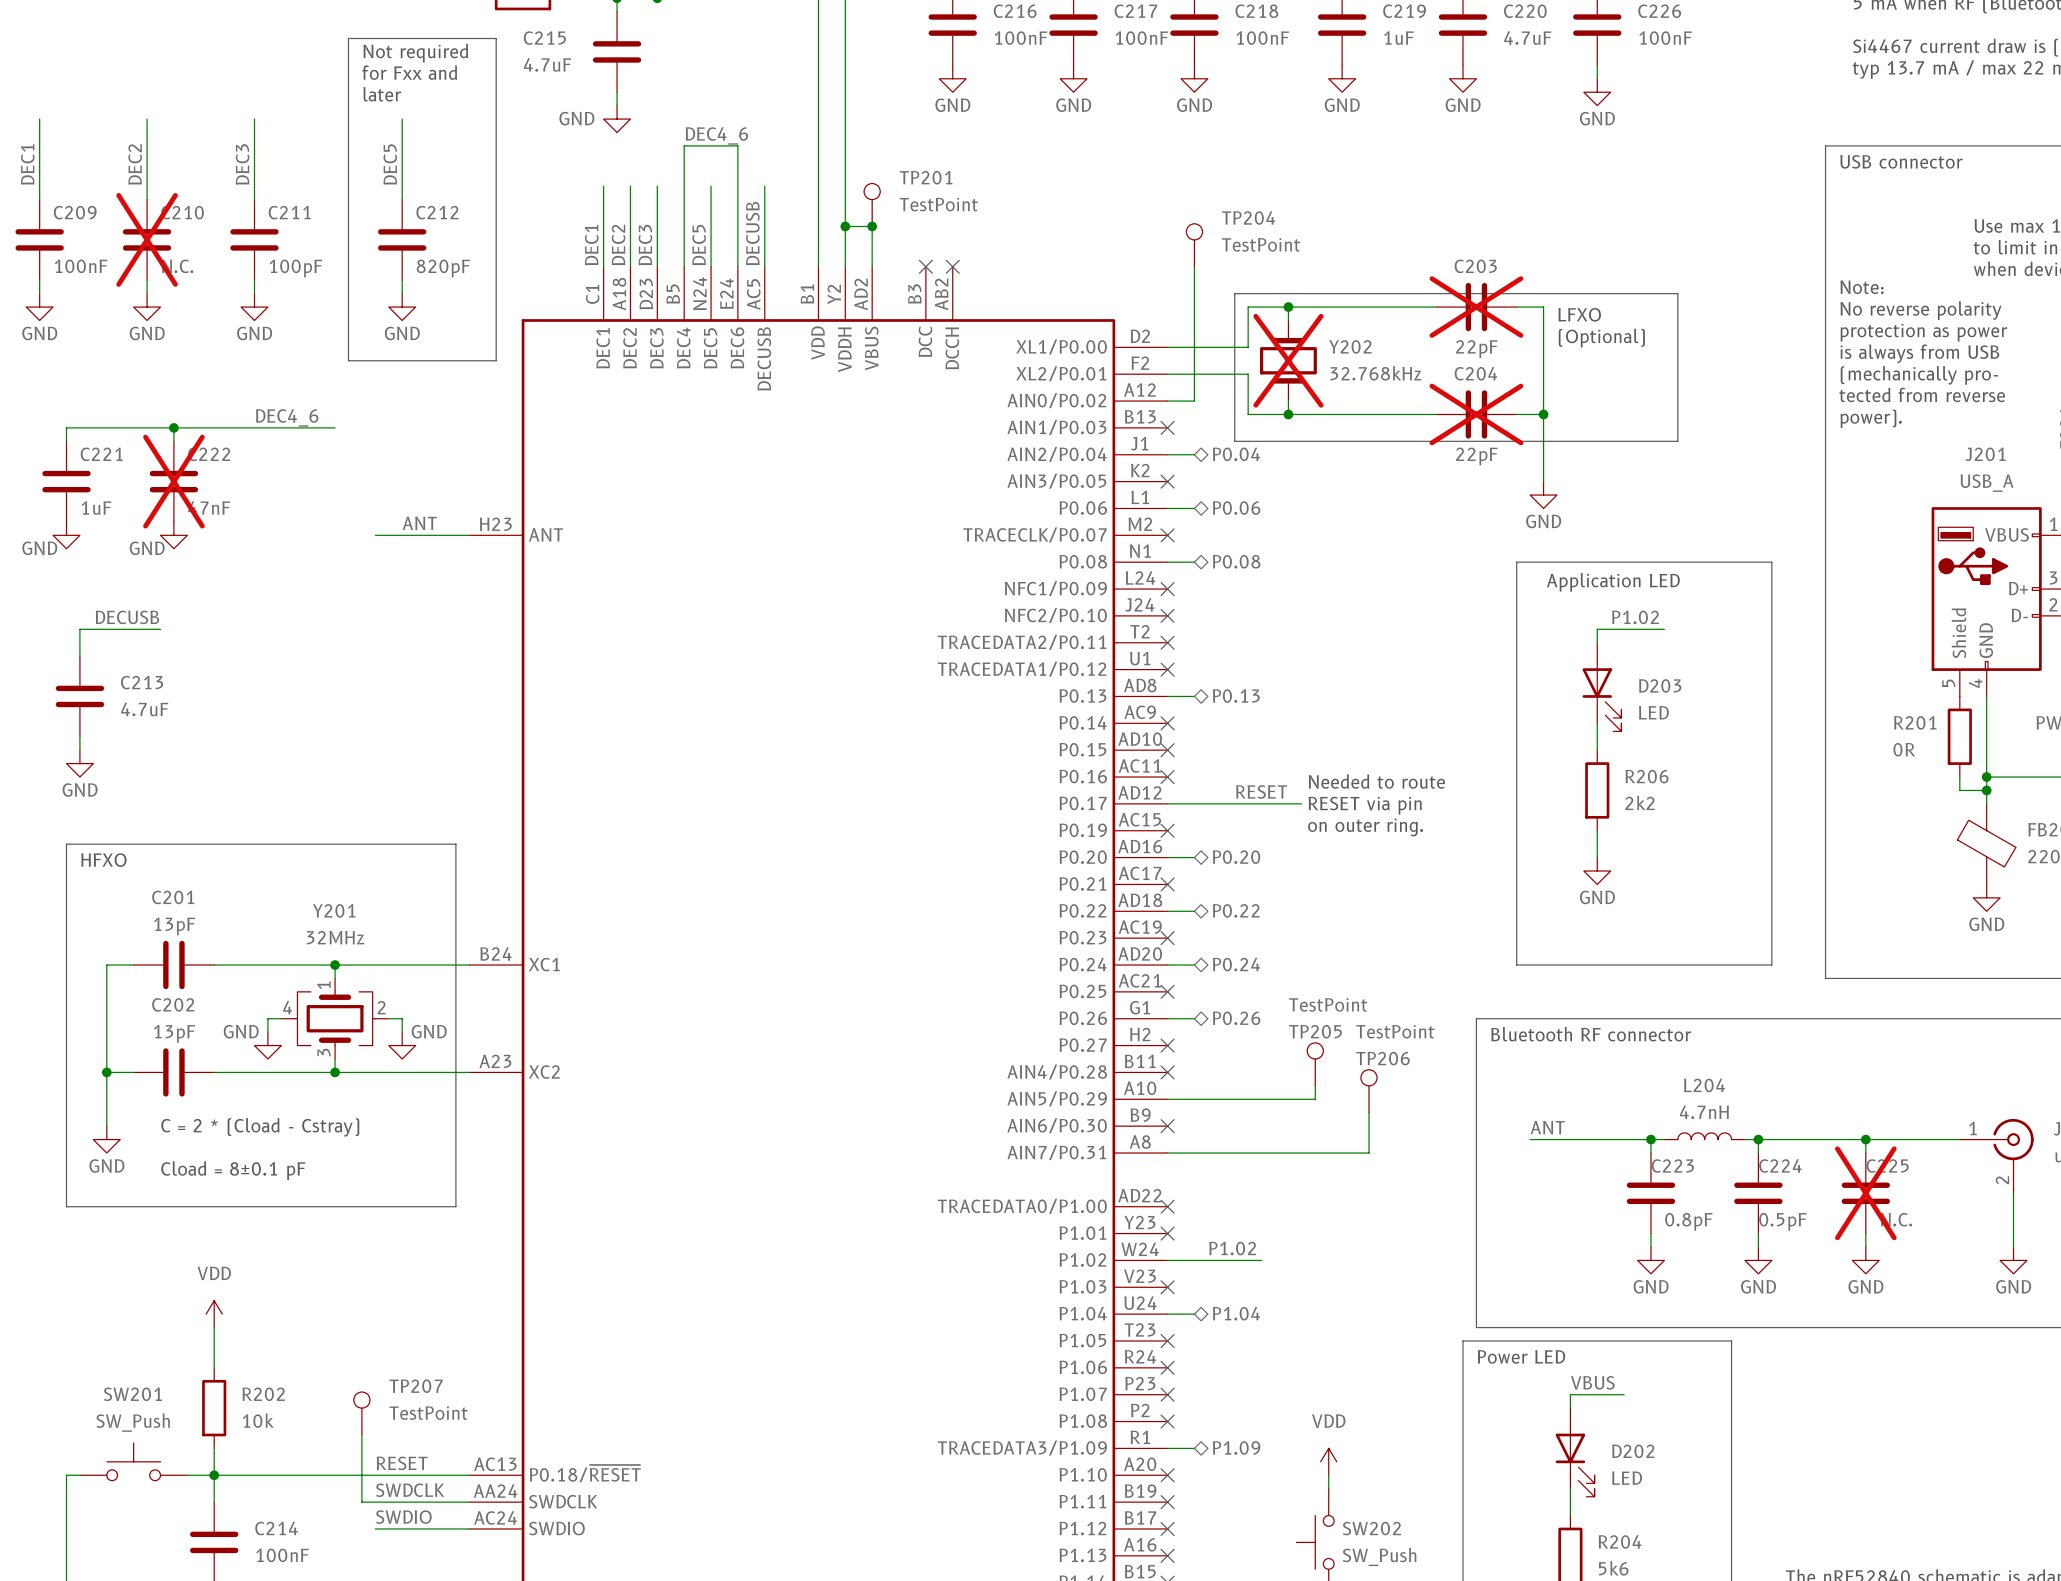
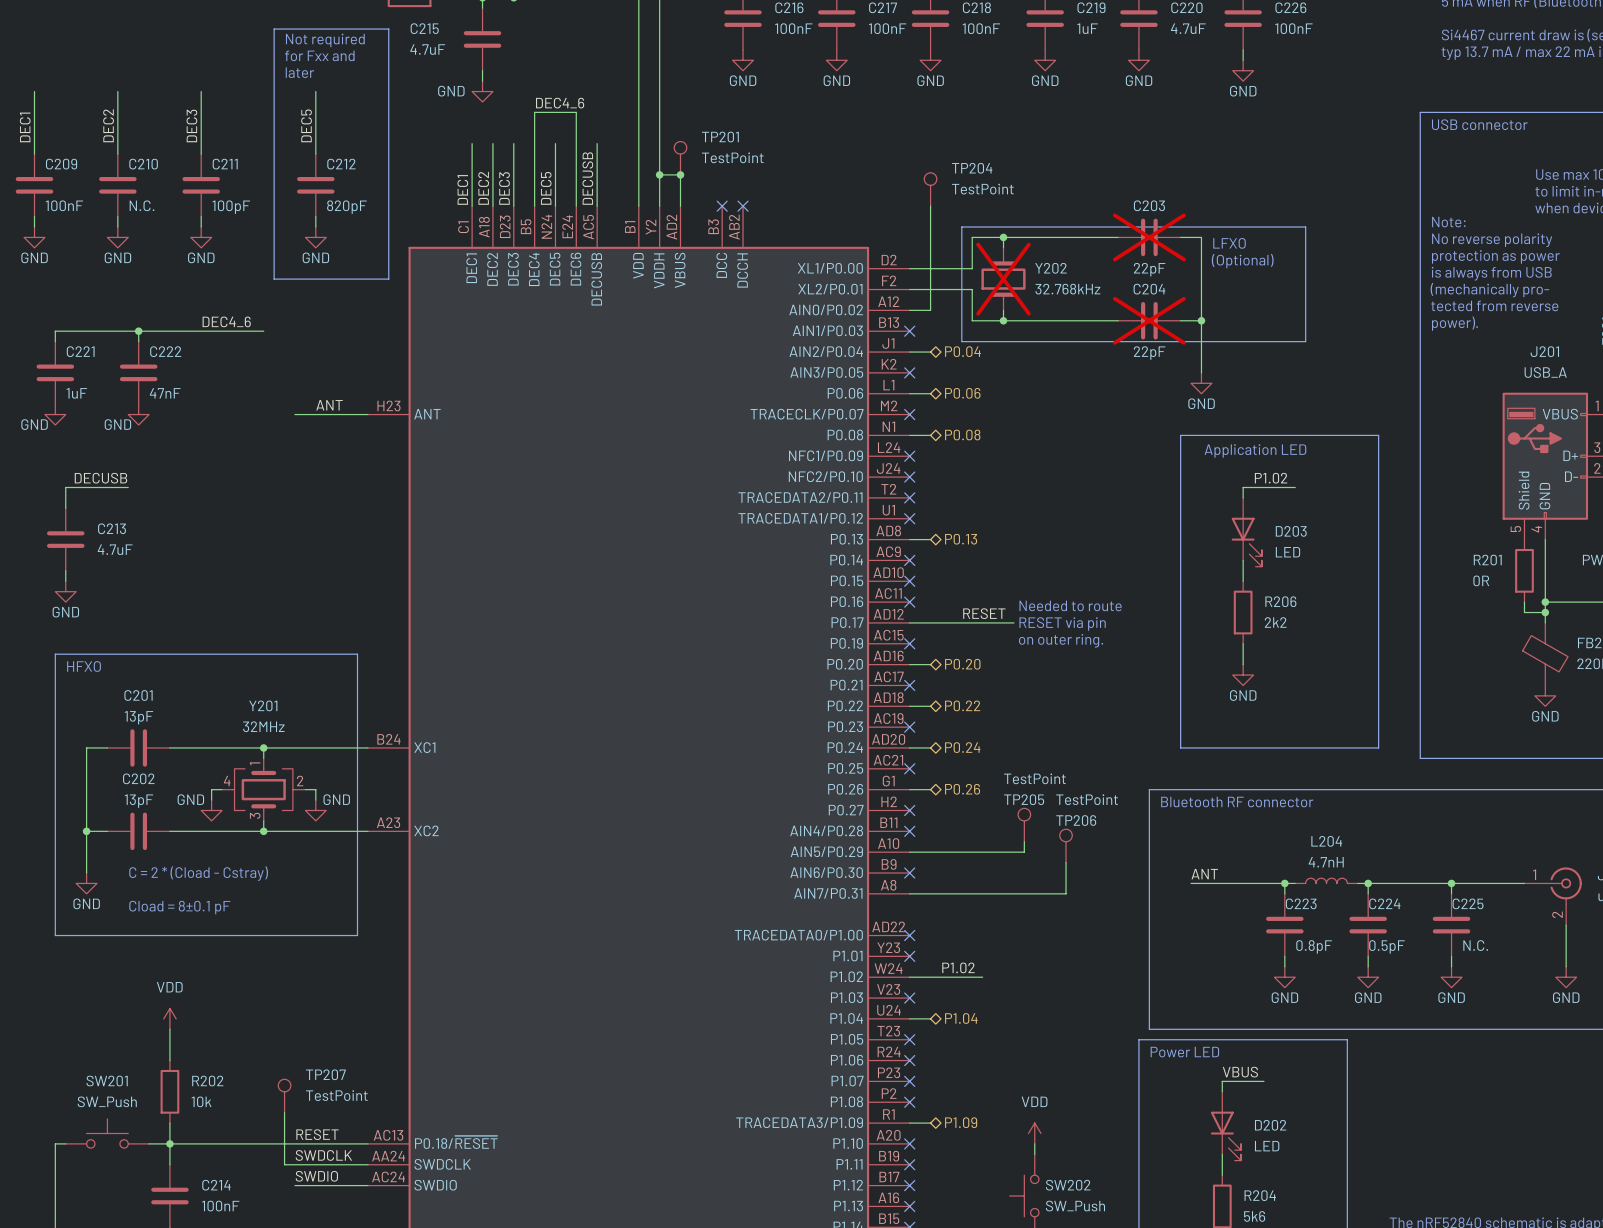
C210 do-not-place cross: (147, 239) -> none
C222 do-not-place cross: (173, 481) -> none
C225 do-not-place cross: (1865, 1193) -> none

